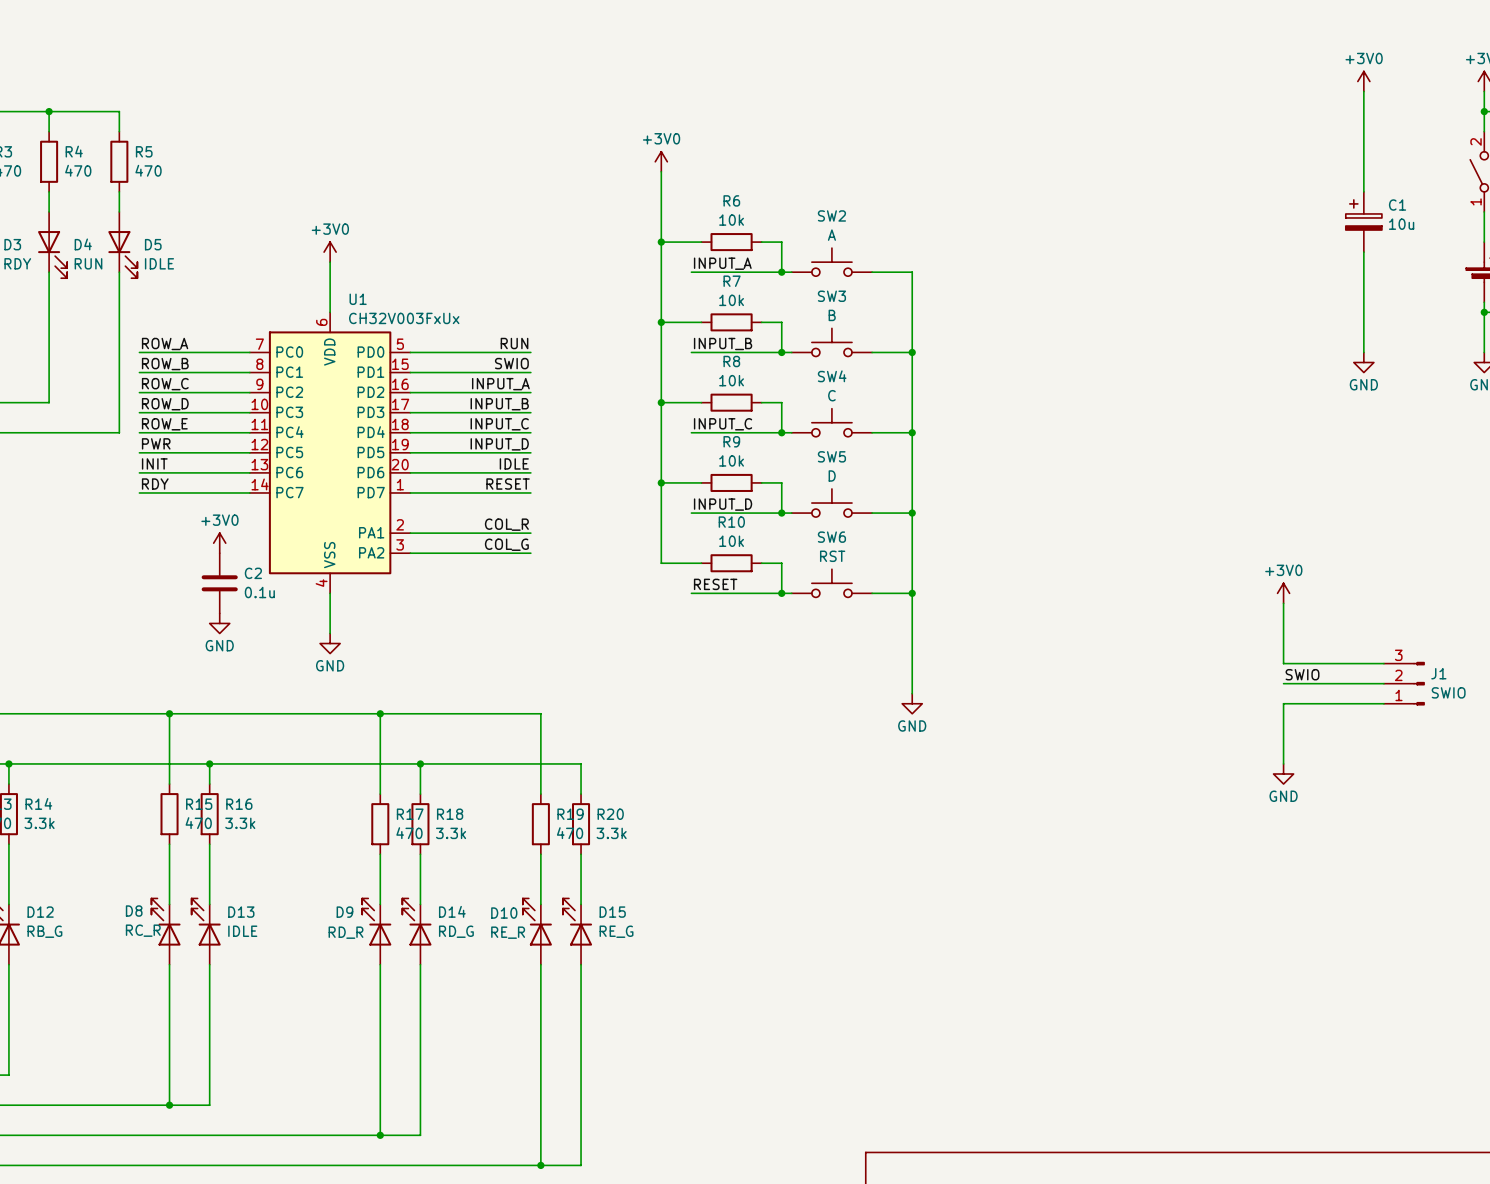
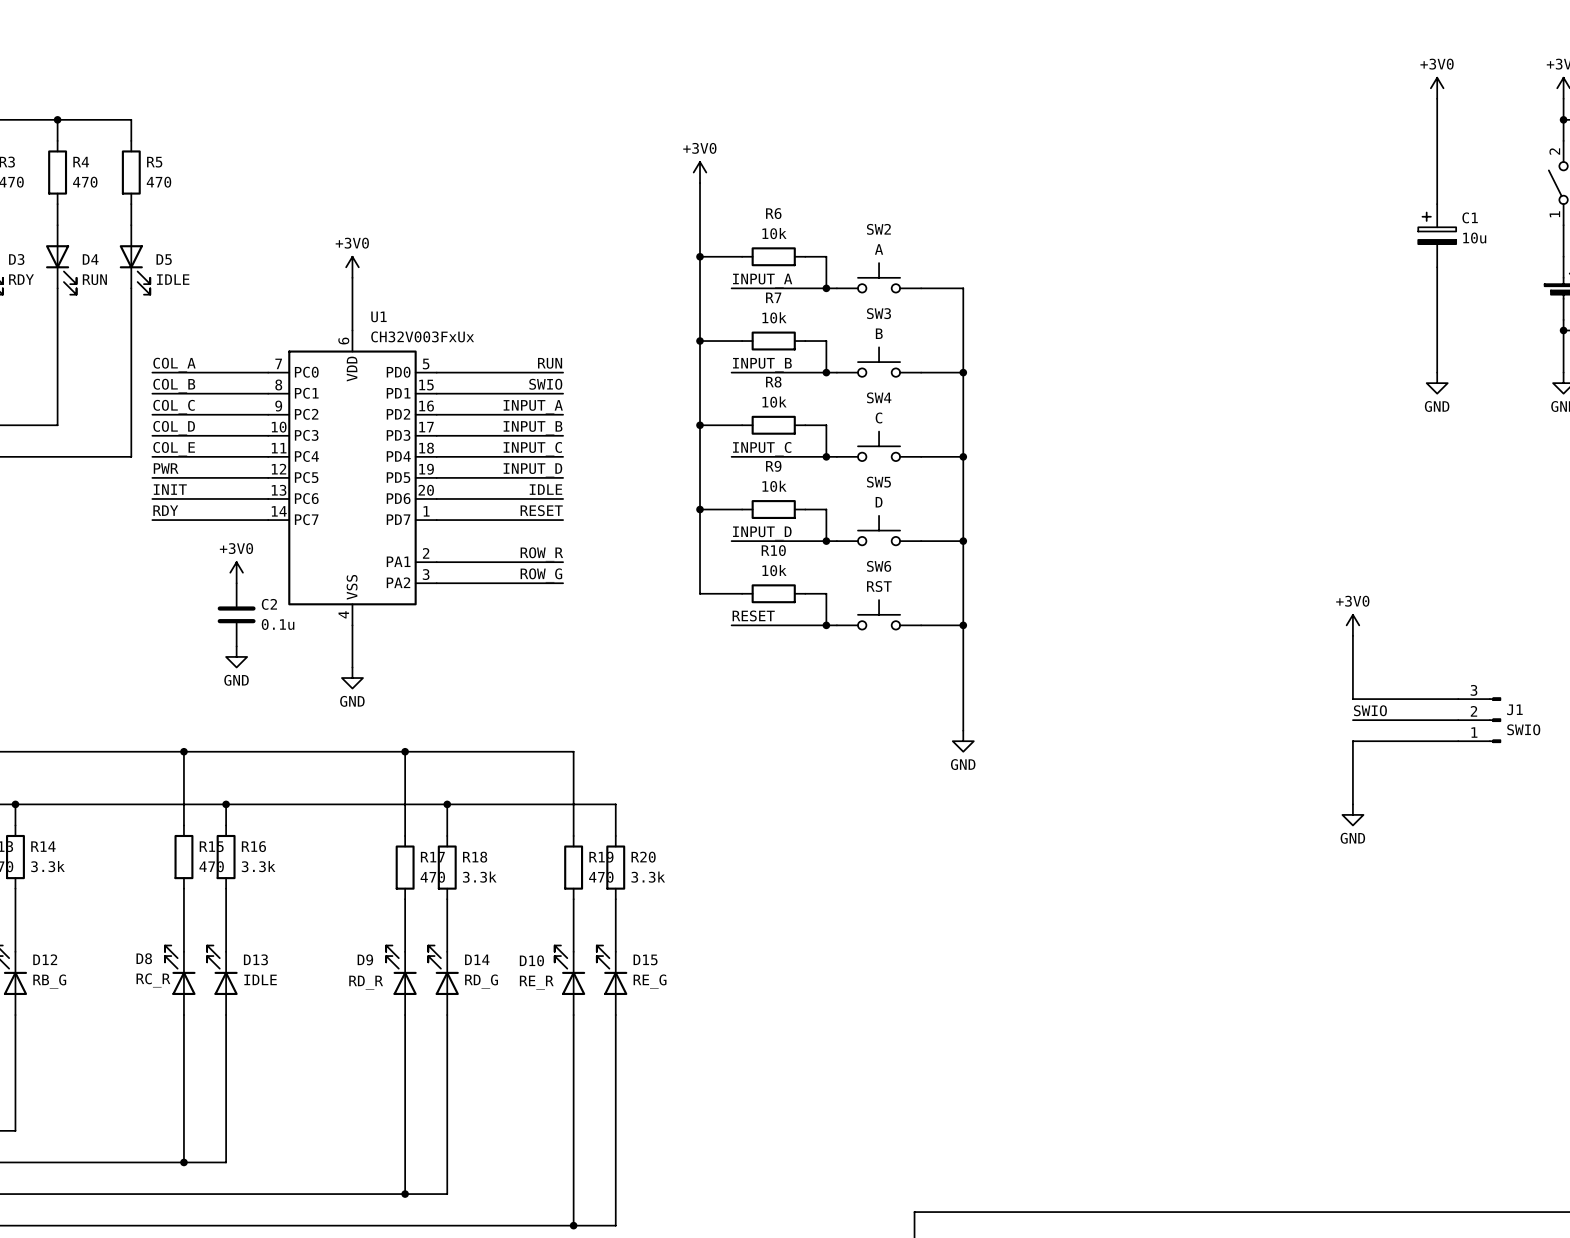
label: ROW_A (165, 343) -> COL_A (174, 364)
label: ROW_B (165, 364) -> COL_B (174, 385)
label: ROW_C (165, 384) -> COL_C (174, 406)
label: ROW_D (165, 404) -> COL_D (174, 428)
label: ROW_E (164, 424) -> COL_E (174, 449)
label: COL_R (506, 524) -> ROW_R (541, 554)
label: COL_G (506, 544) -> ROW_G (541, 575)

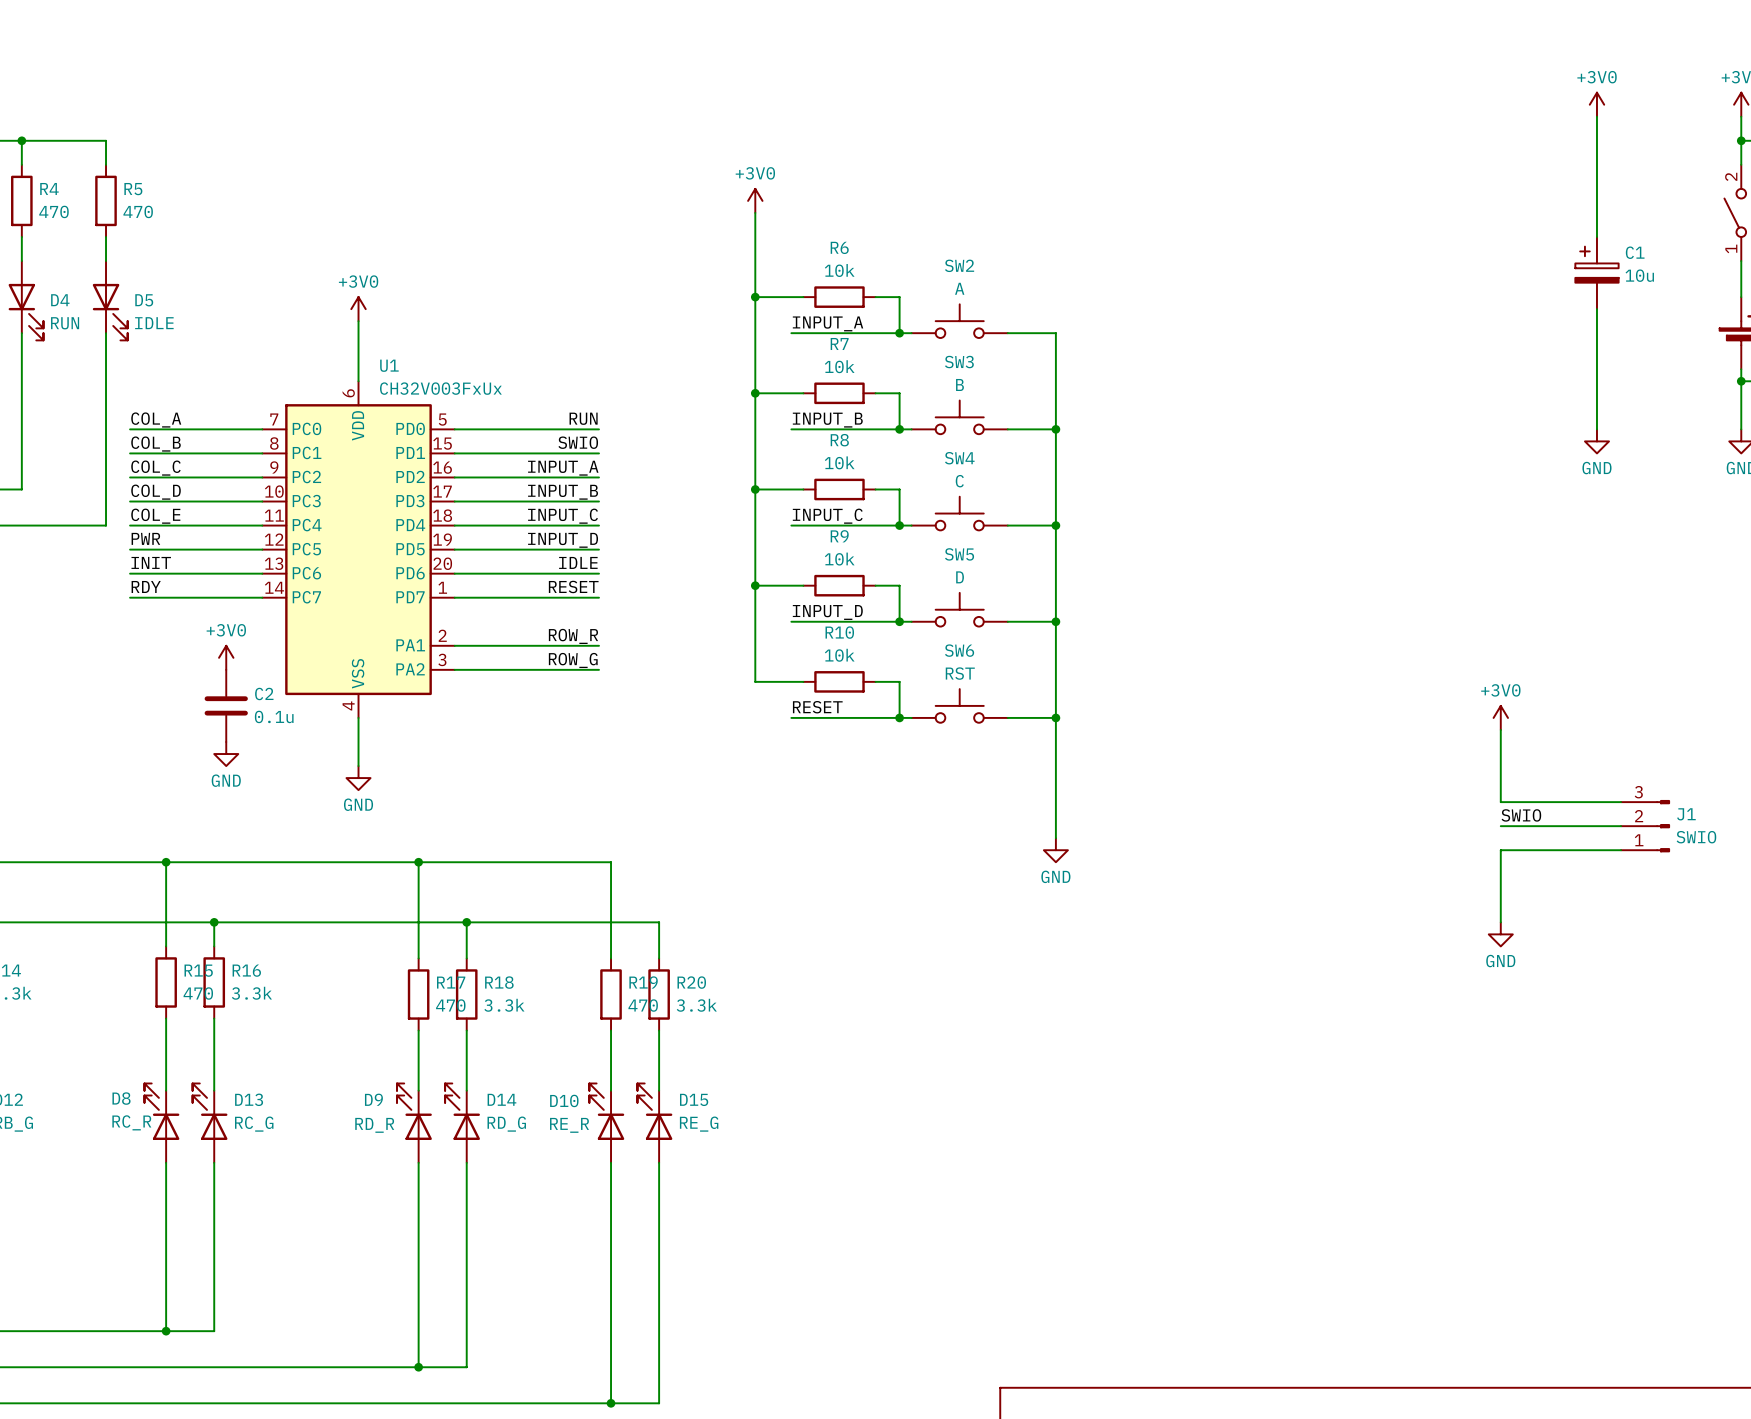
D13 value: IDLE (260, 979) -> RC_G (254, 1124)

